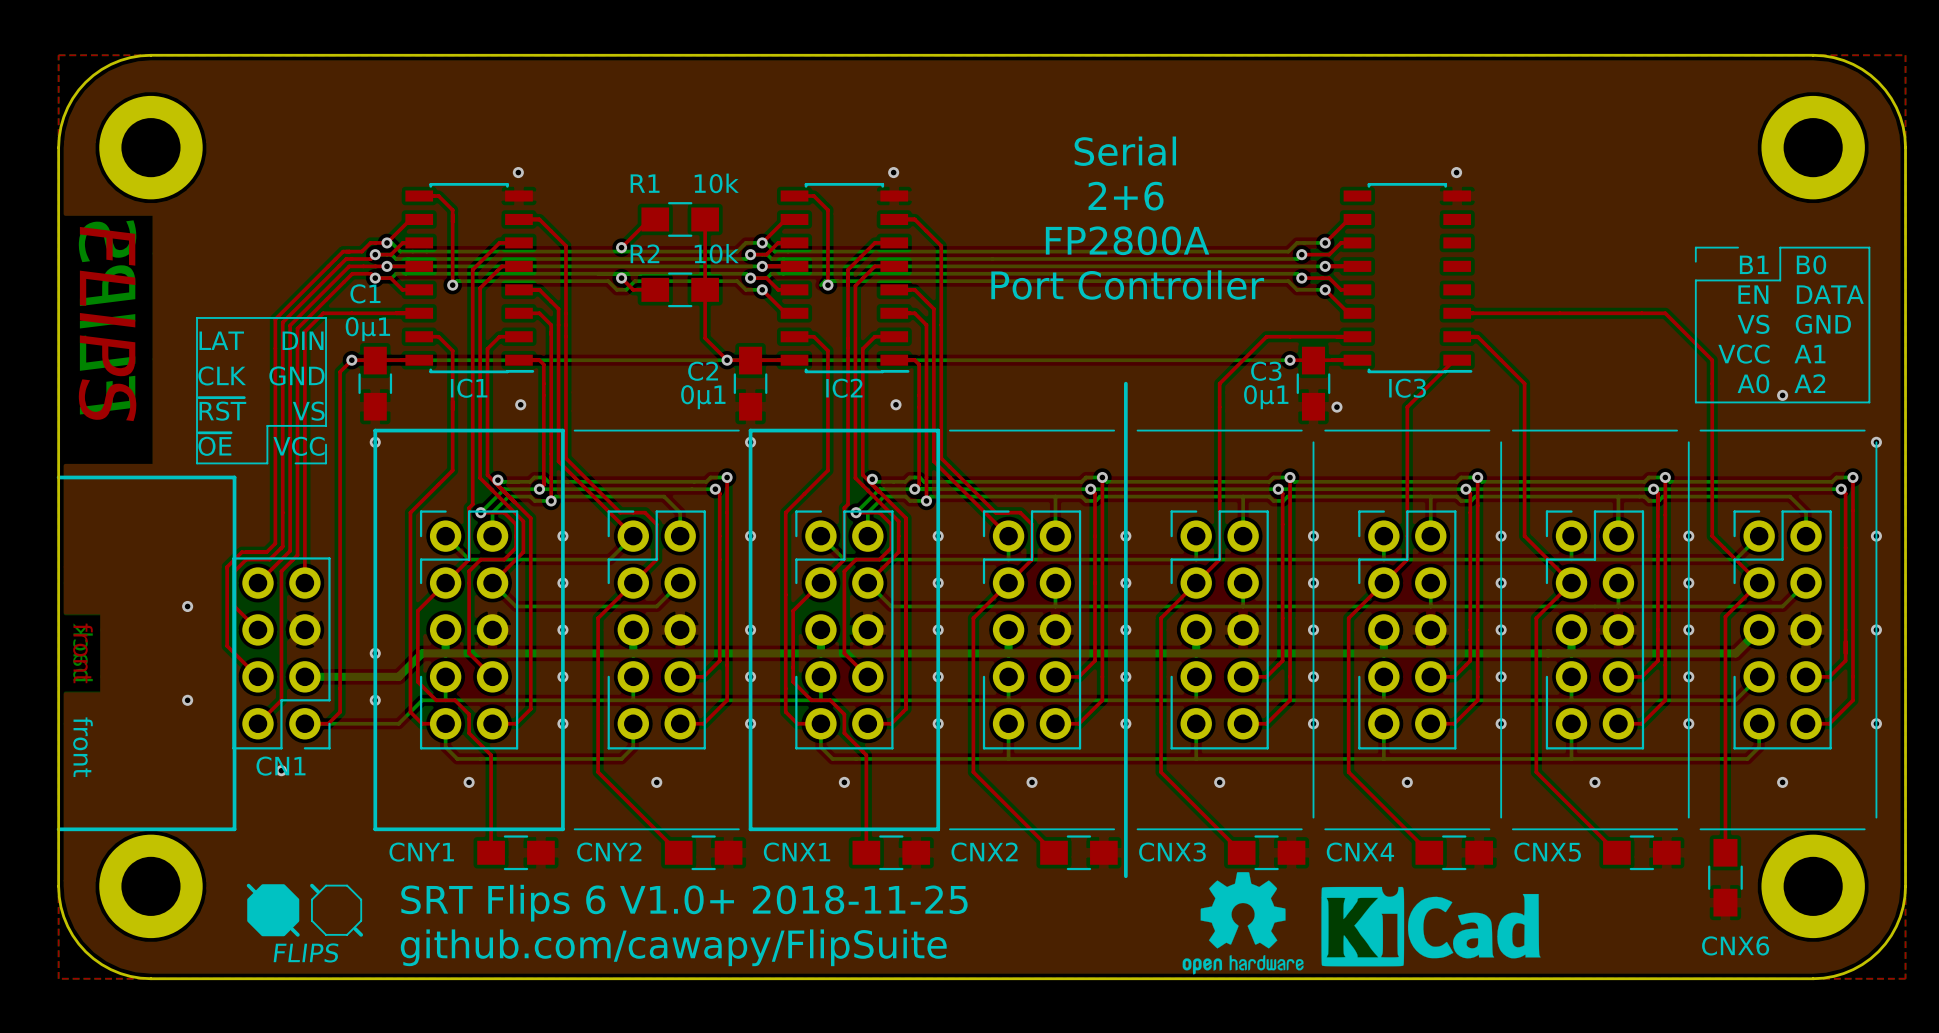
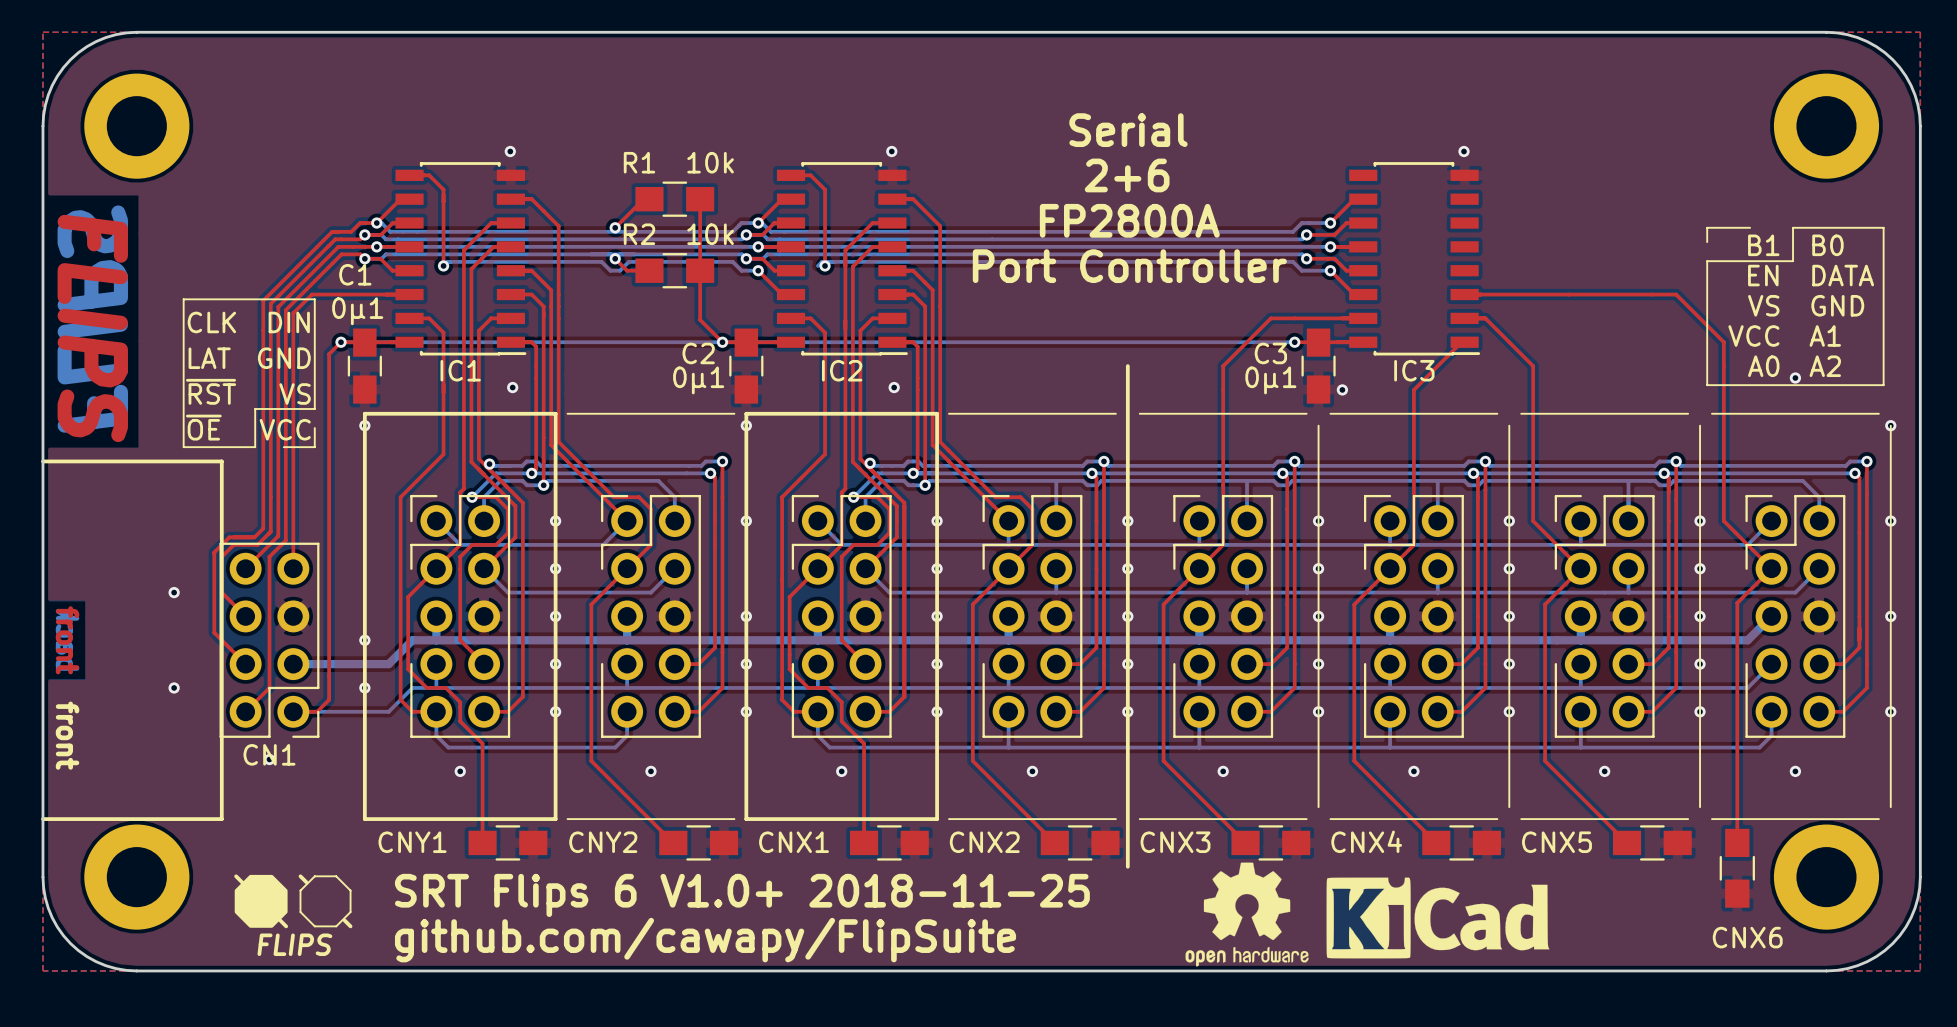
text: LAT (221, 340) -> CLK (211, 322)
text: CLK (222, 375) -> LAT (209, 358)

